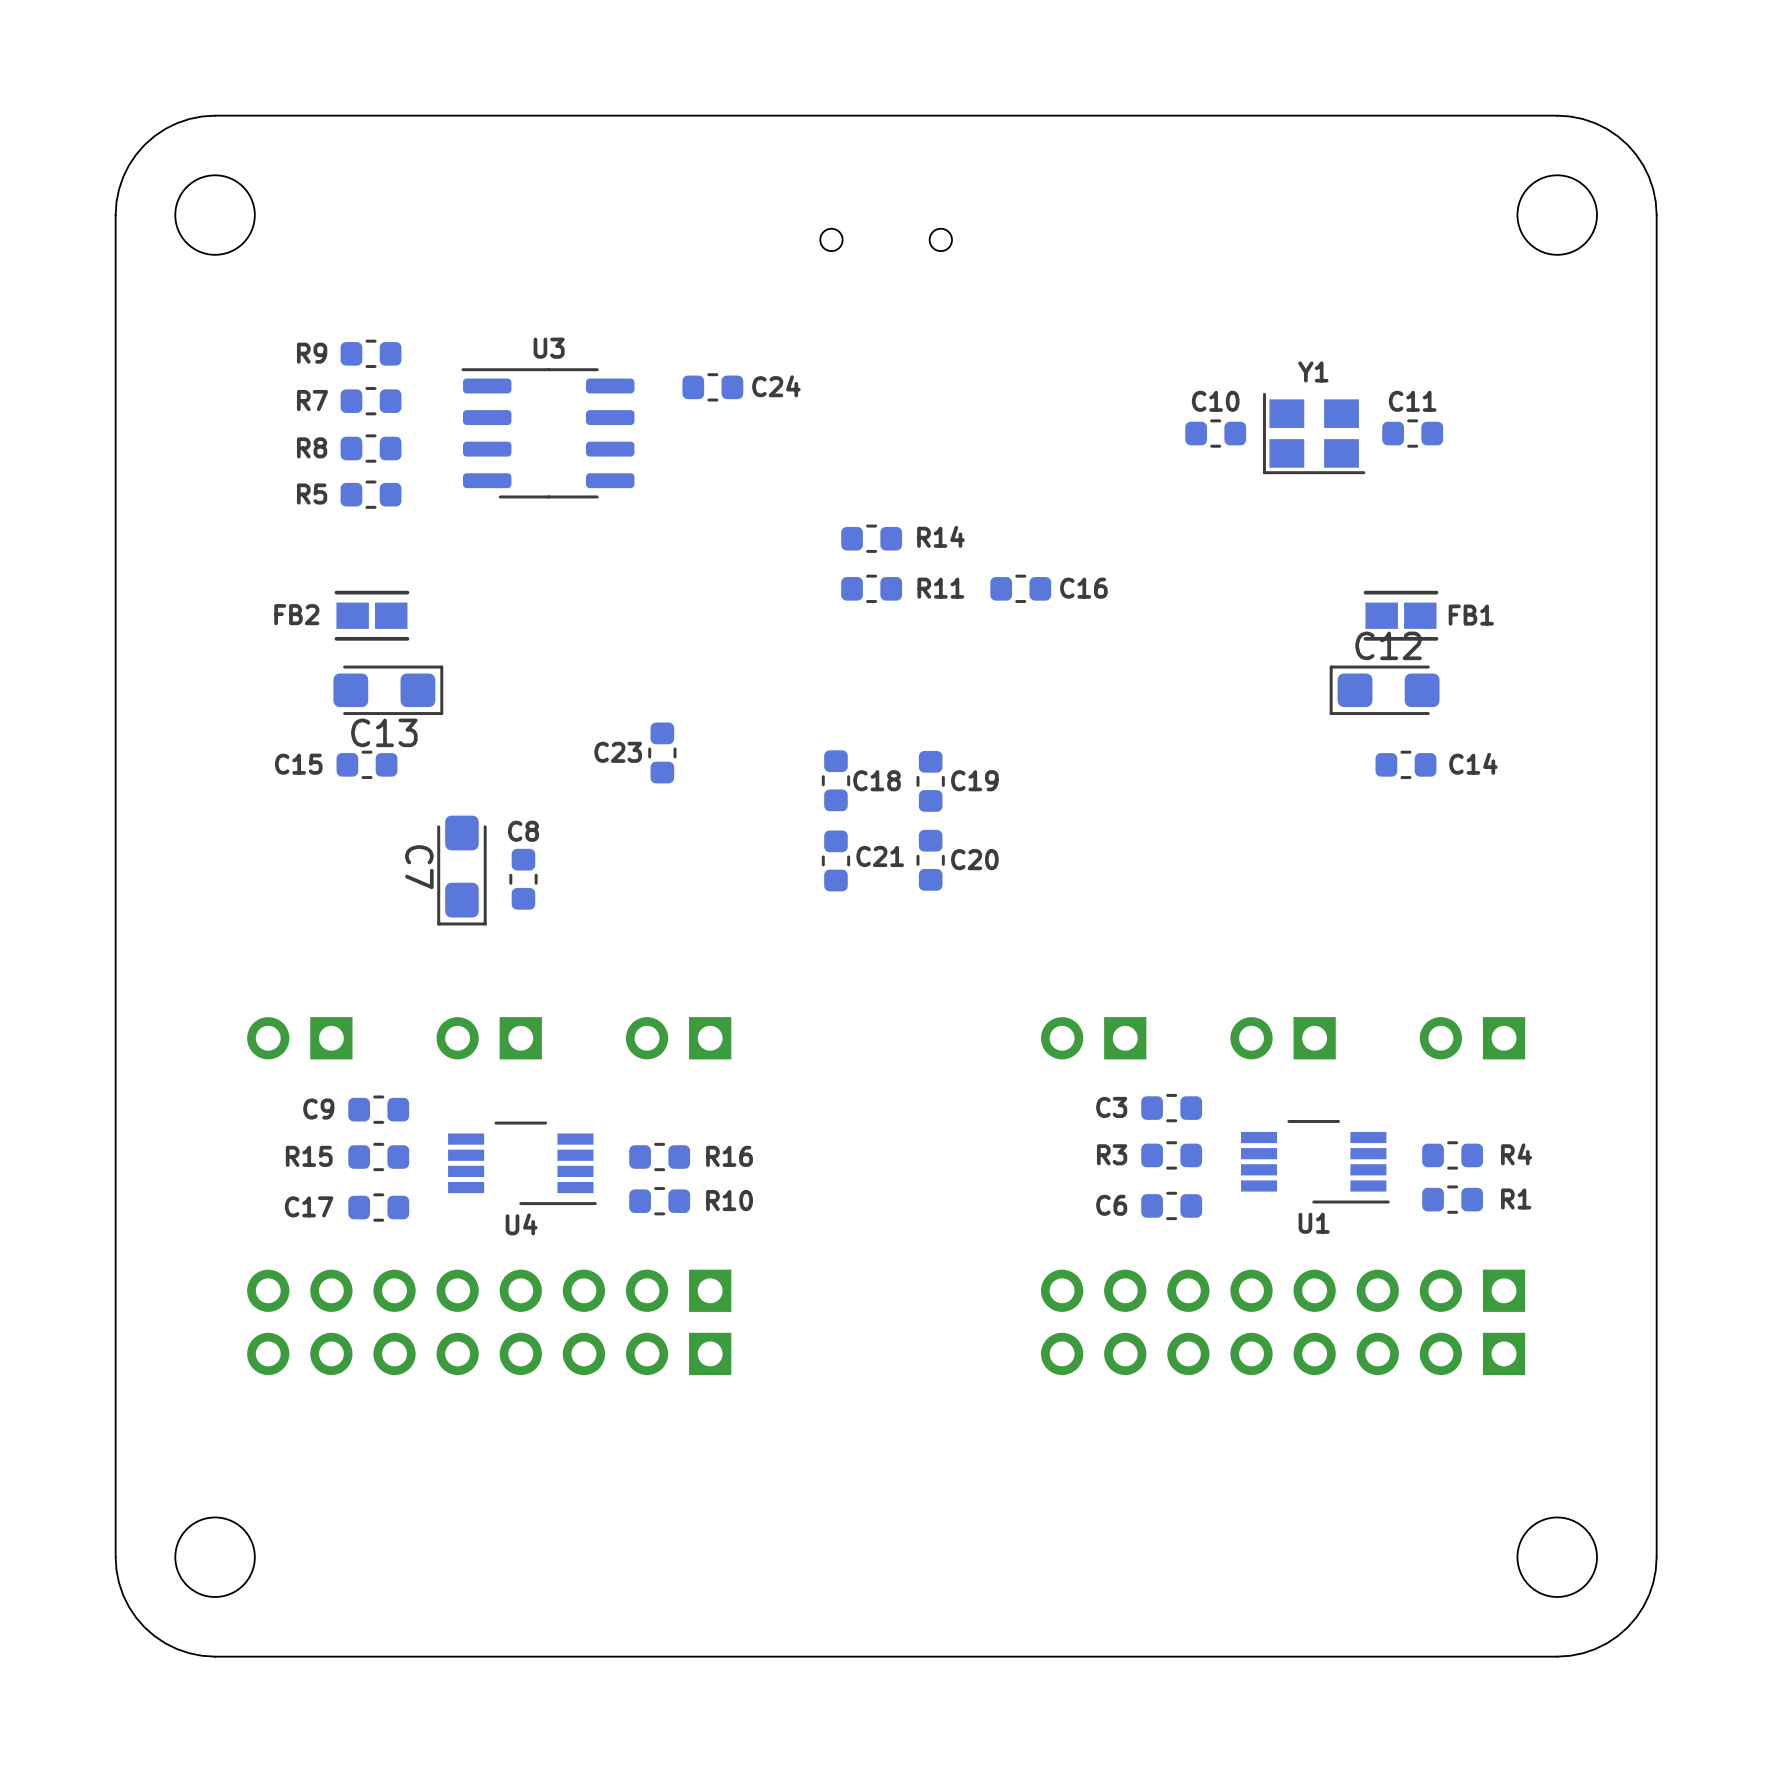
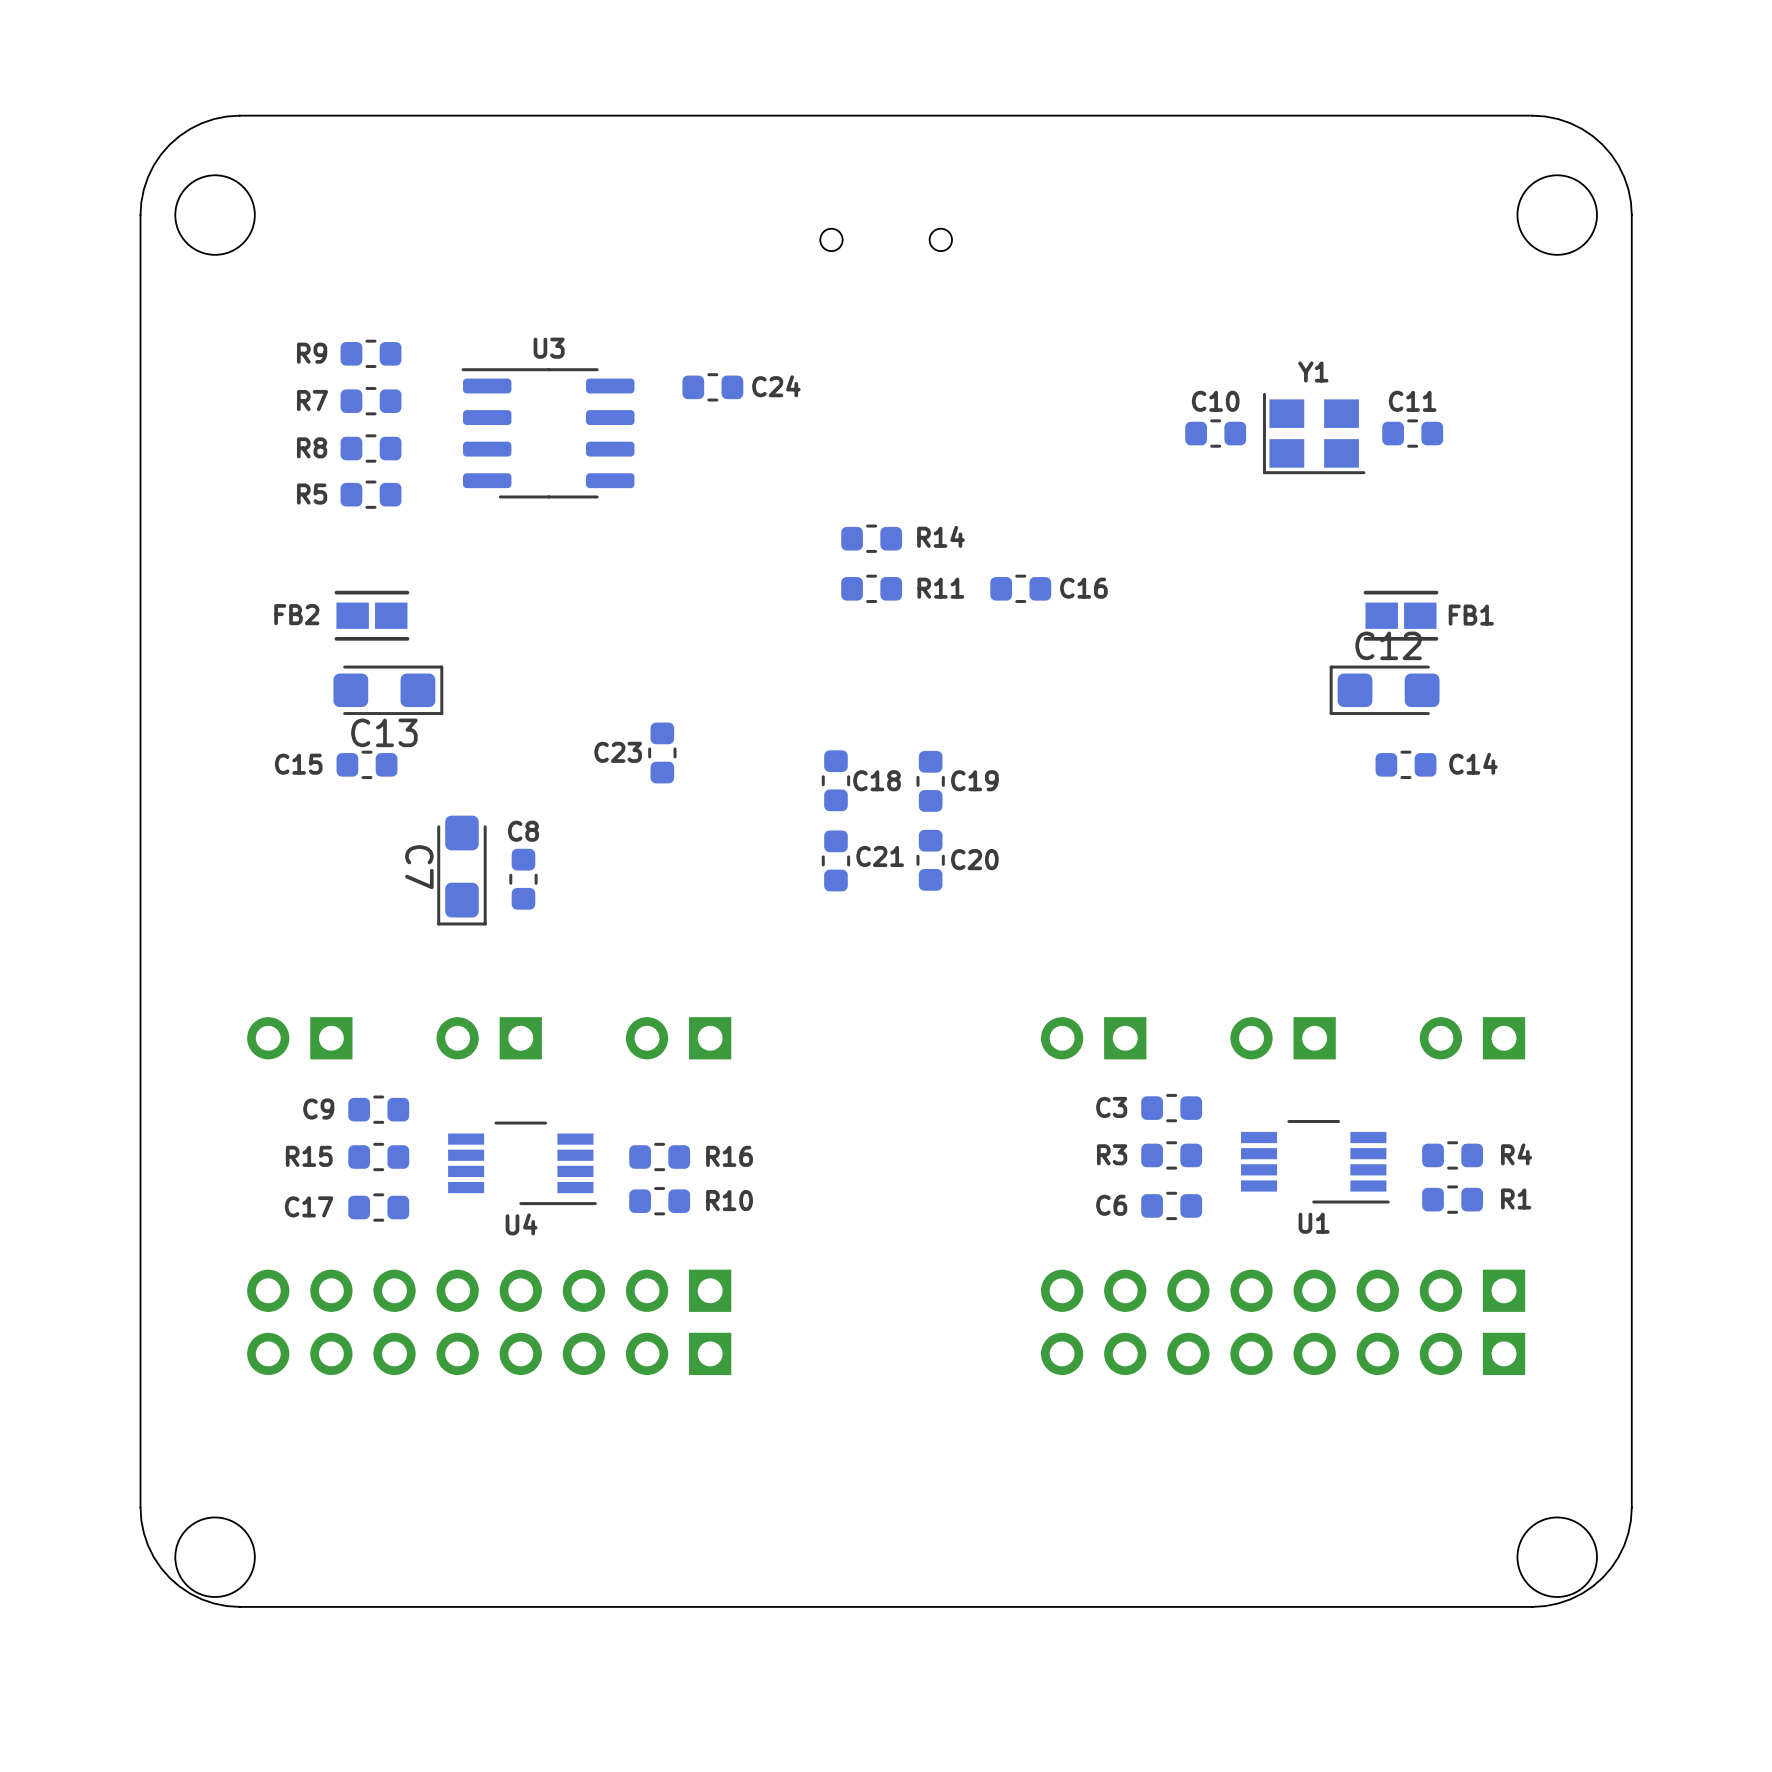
board edge: (1532, 115) (1570, 116) (1582, 119) (1595, 123) (1617, 136) (1636, 154) (1649, 177) (1653, 189) (1656, 215) (1655, 1570) (1653, 1582) (1643, 1606) (1636, 1617) (1617, 1636) (1595, 1649) (1570, 1655) (1557, 1656) (215, 1656) (189, 1653) (165, 1643) (144, 1627) (136, 1617) (123, 1595) (116, 1570) (115, 1557) (116, 202) (123, 177) (128, 165) (136, 154) (154, 136) (177, 123) (189, 119) (202, 116) (239, 115) -> (1532, 115) (1558, 119) (1570, 123) (1592, 136) (1602, 144) (1611, 154) (1624, 177) (1628, 189) (1631, 215) (1630, 1520) (1628, 1533) (1618, 1557) (1611, 1568) (1592, 1586) (1570, 1599) (1558, 1603) (1532, 1606) (239, 1606) (214, 1603) (201, 1599) (179, 1586) (161, 1568) (148, 1545) (143, 1533) (140, 1507) (140, 215) (143, 189) (148, 177) (153, 165) (169, 144) (179, 136) (201, 123) (214, 119) (239, 115)

